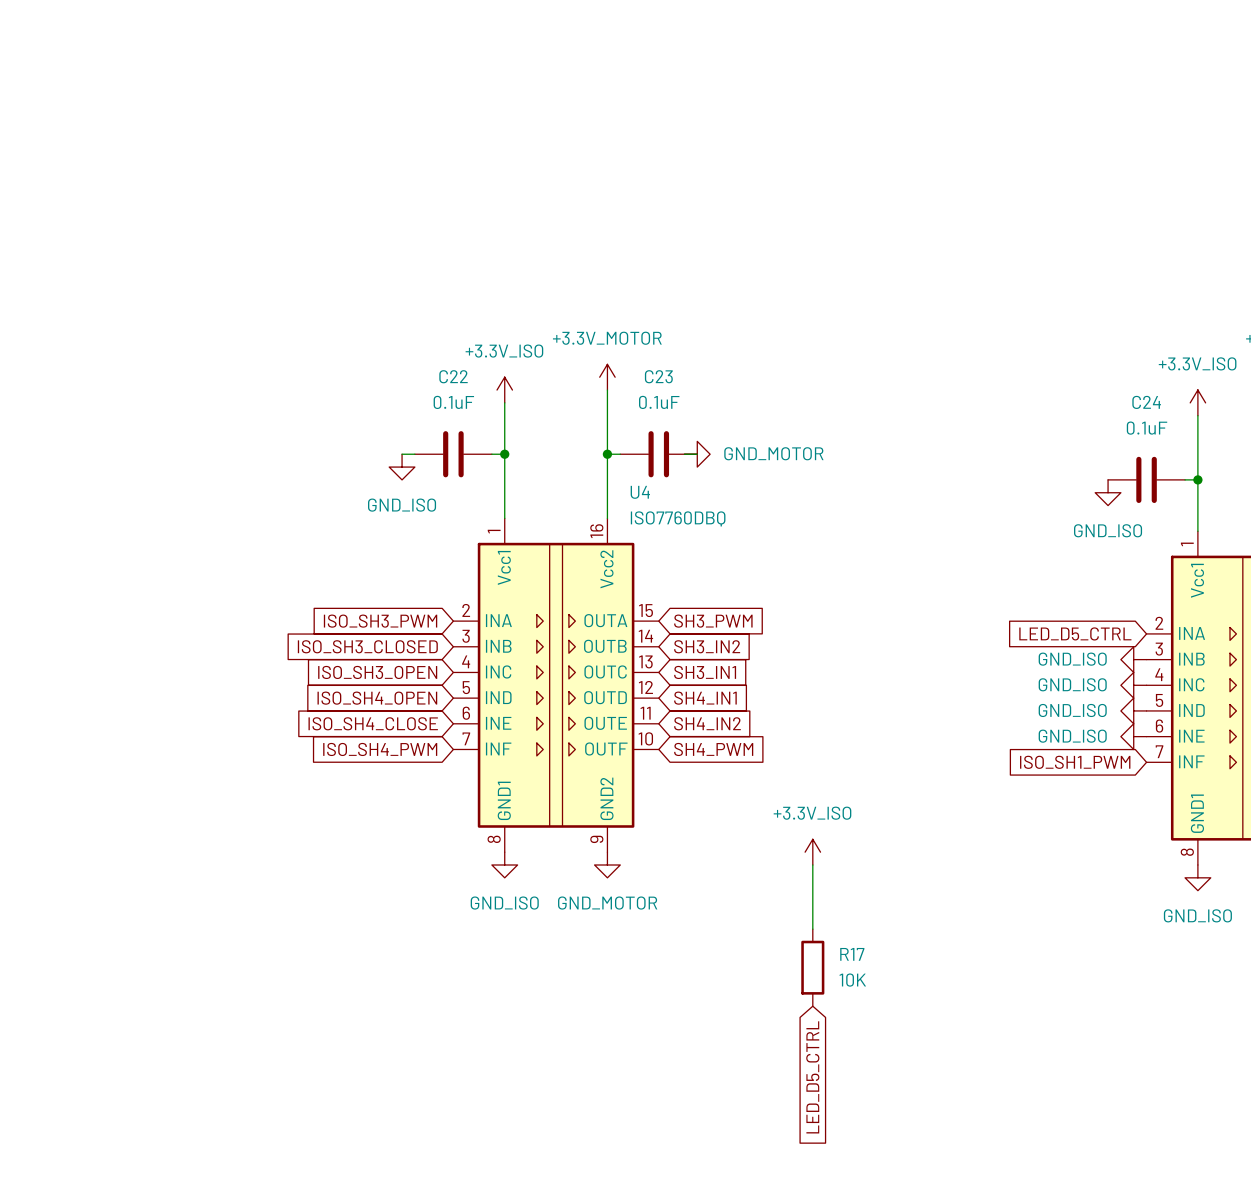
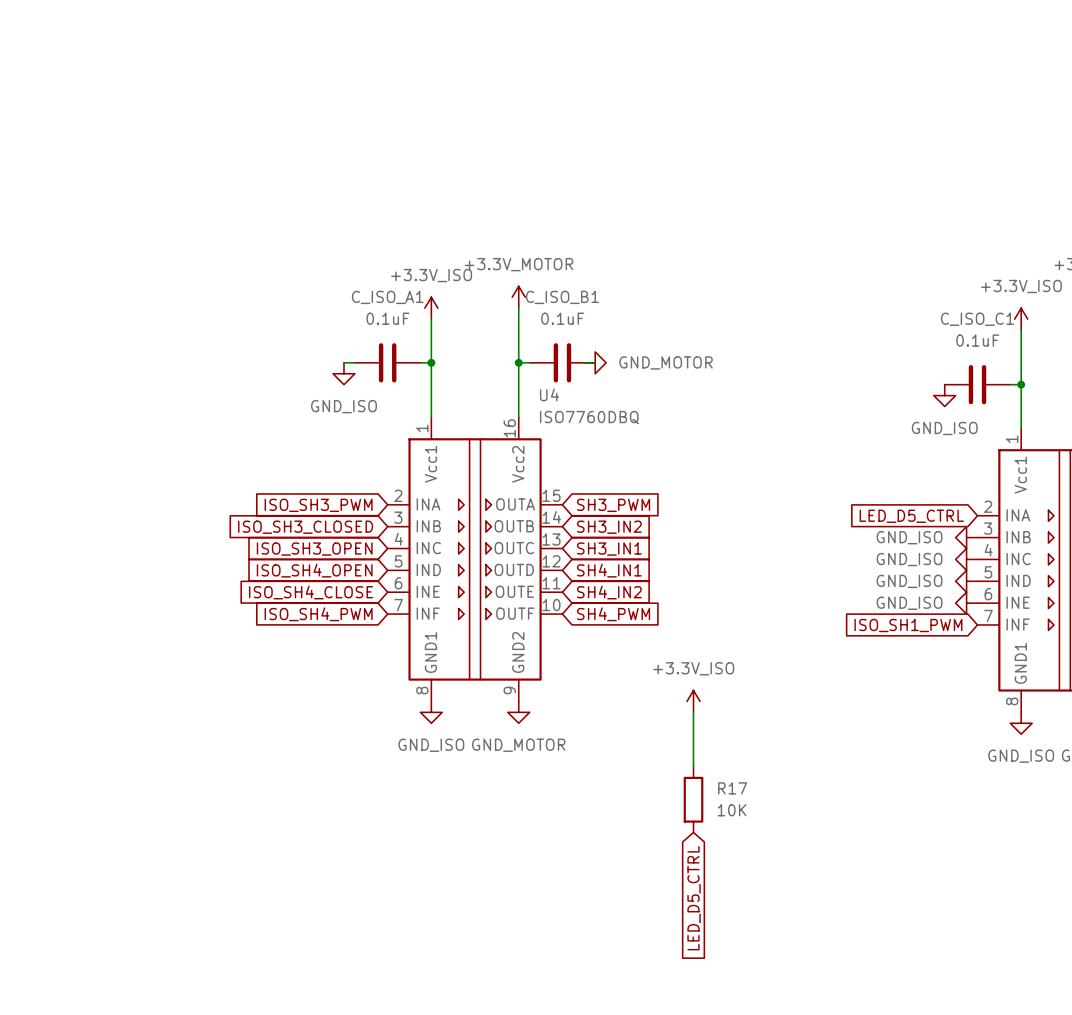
C22 name: C22 (453, 376) -> C_ISO_A1 (387, 297)
C23 name: C23 (658, 376) -> C_ISO_B1 (562, 297)
C24 name: C24 (1146, 402) -> C_ISO_C1 (977, 319)

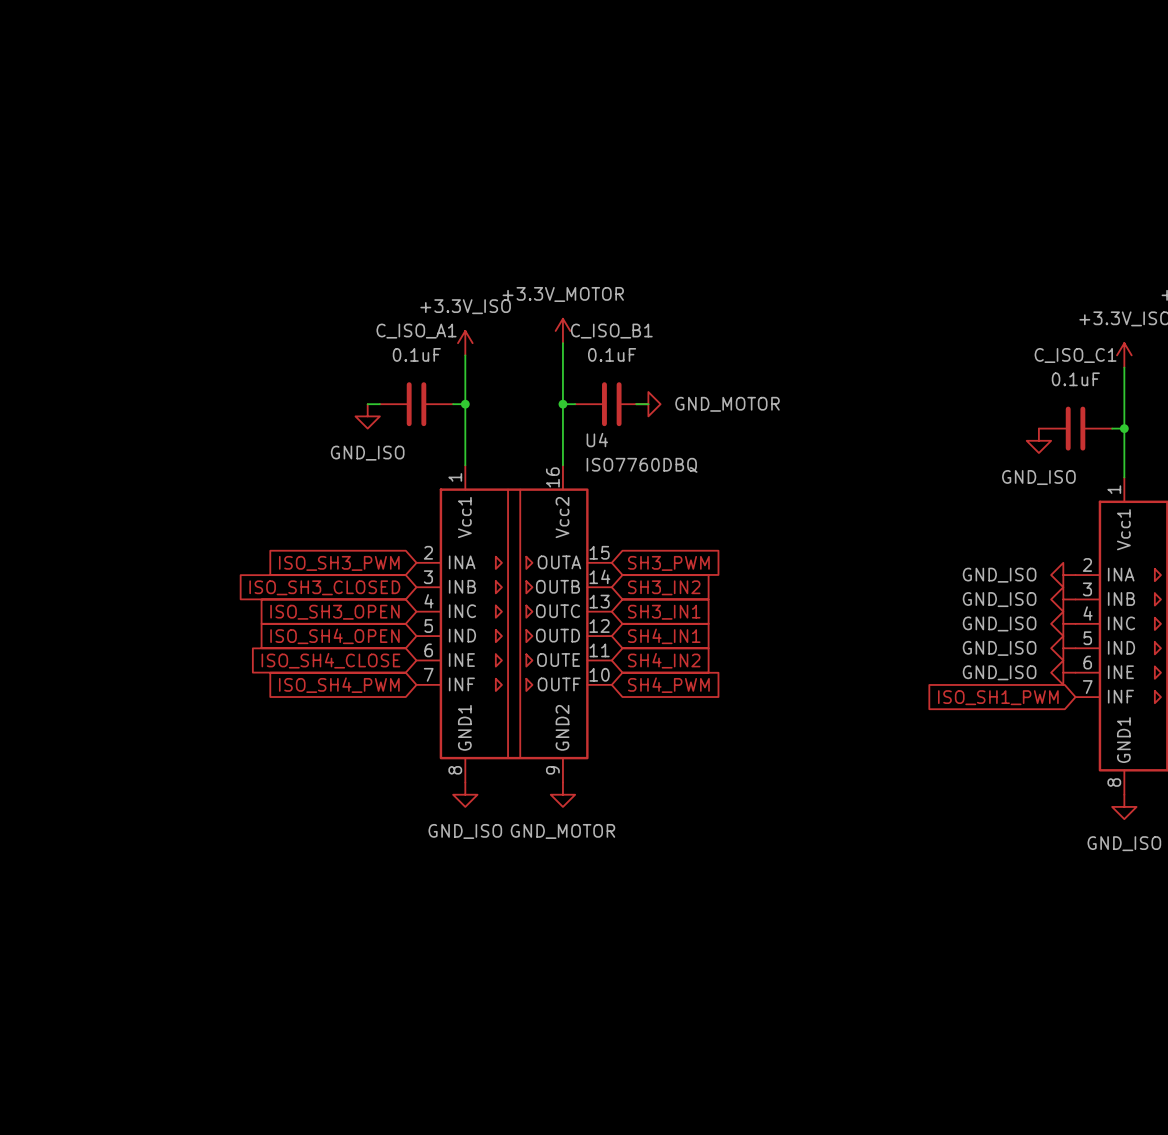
power symbol: none -> GND_ISO (1063, 575)
global label: LED_D5_CTRL (911, 516) -> none
power symbol: +3.3V_ISO (693, 701) -> none
wire: (693, 712) (693, 766) -> none
R17: 10K (693, 799) -> none
global label: LED_D5_CTRL (694, 898) -> none

